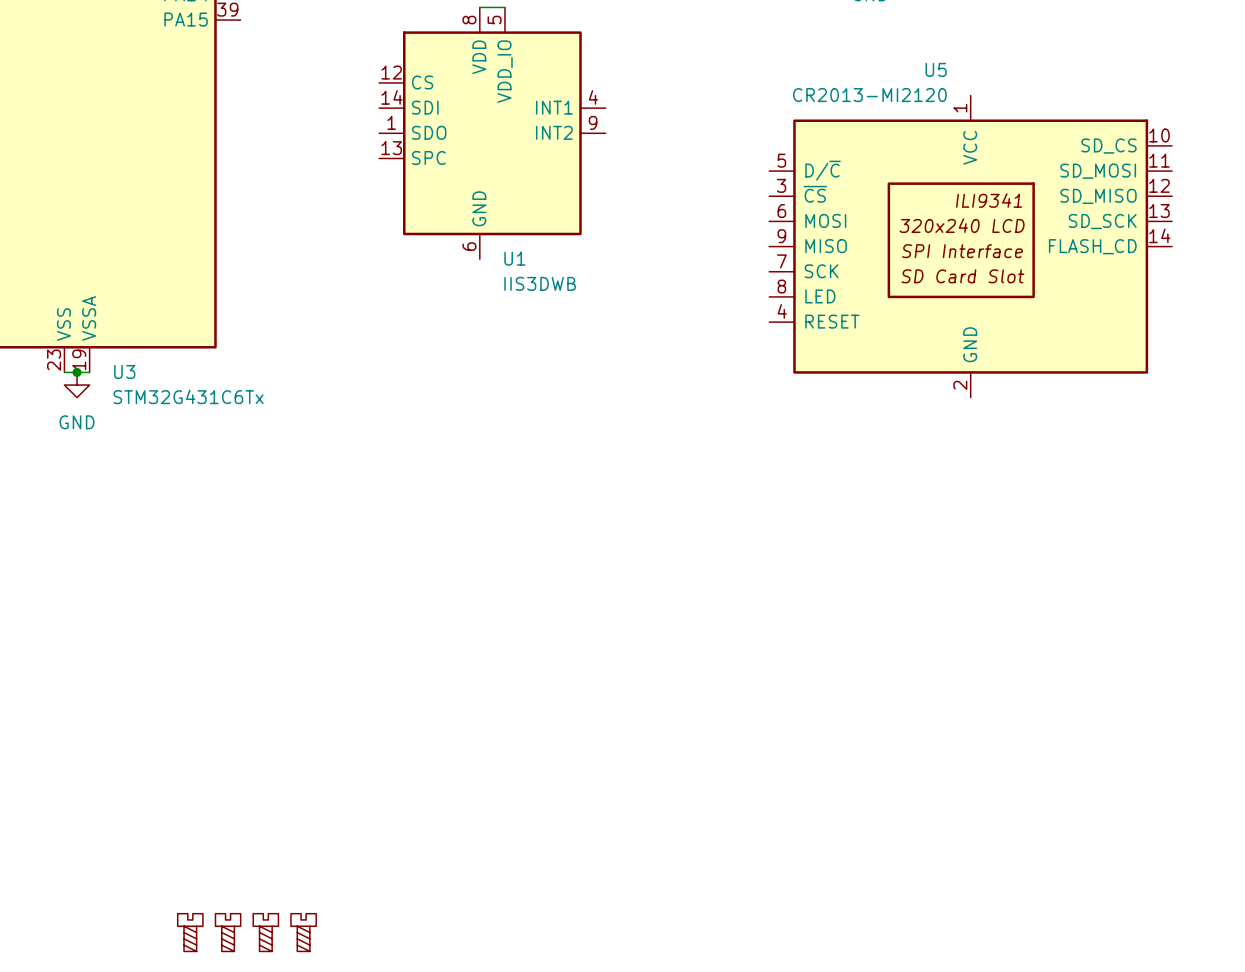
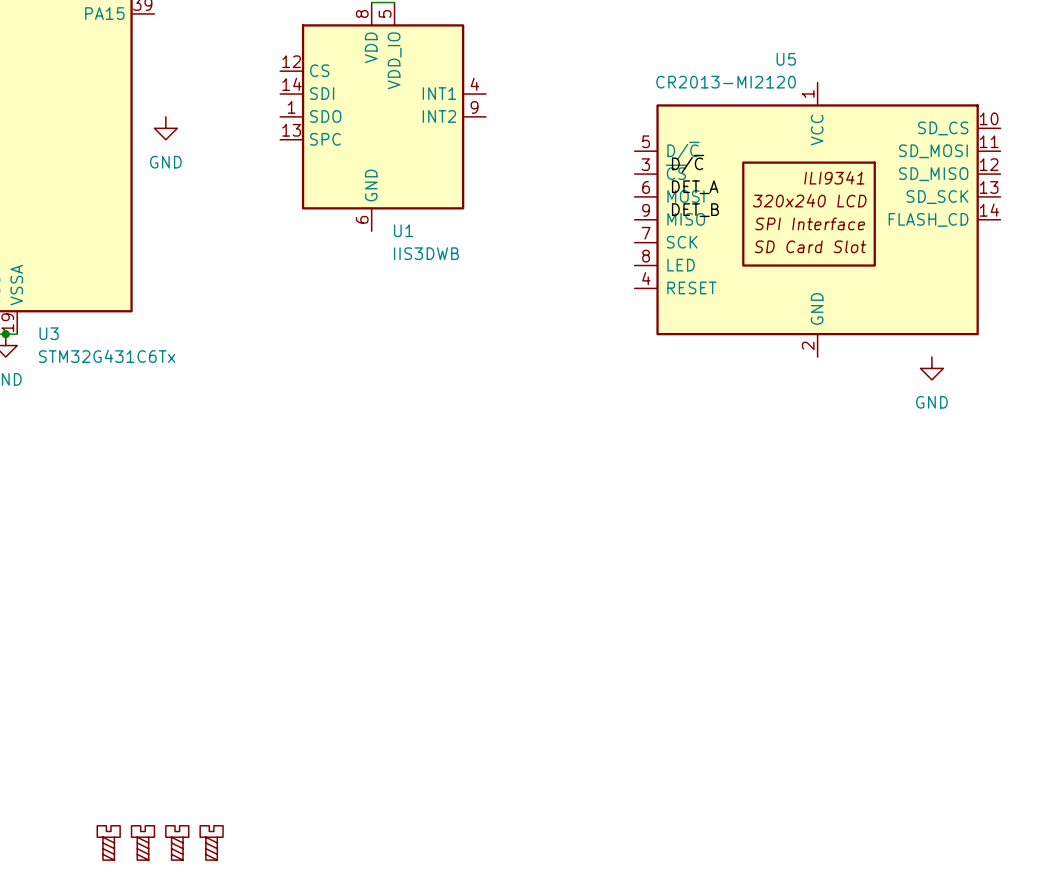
power symbol: none -> GND (165, 128)
label: none -> D/~{C} (688, 163)
label: none -> DET_A (695, 187)
label: none -> DET_B (695, 210)
power symbol: none -> GND (931, 368)

